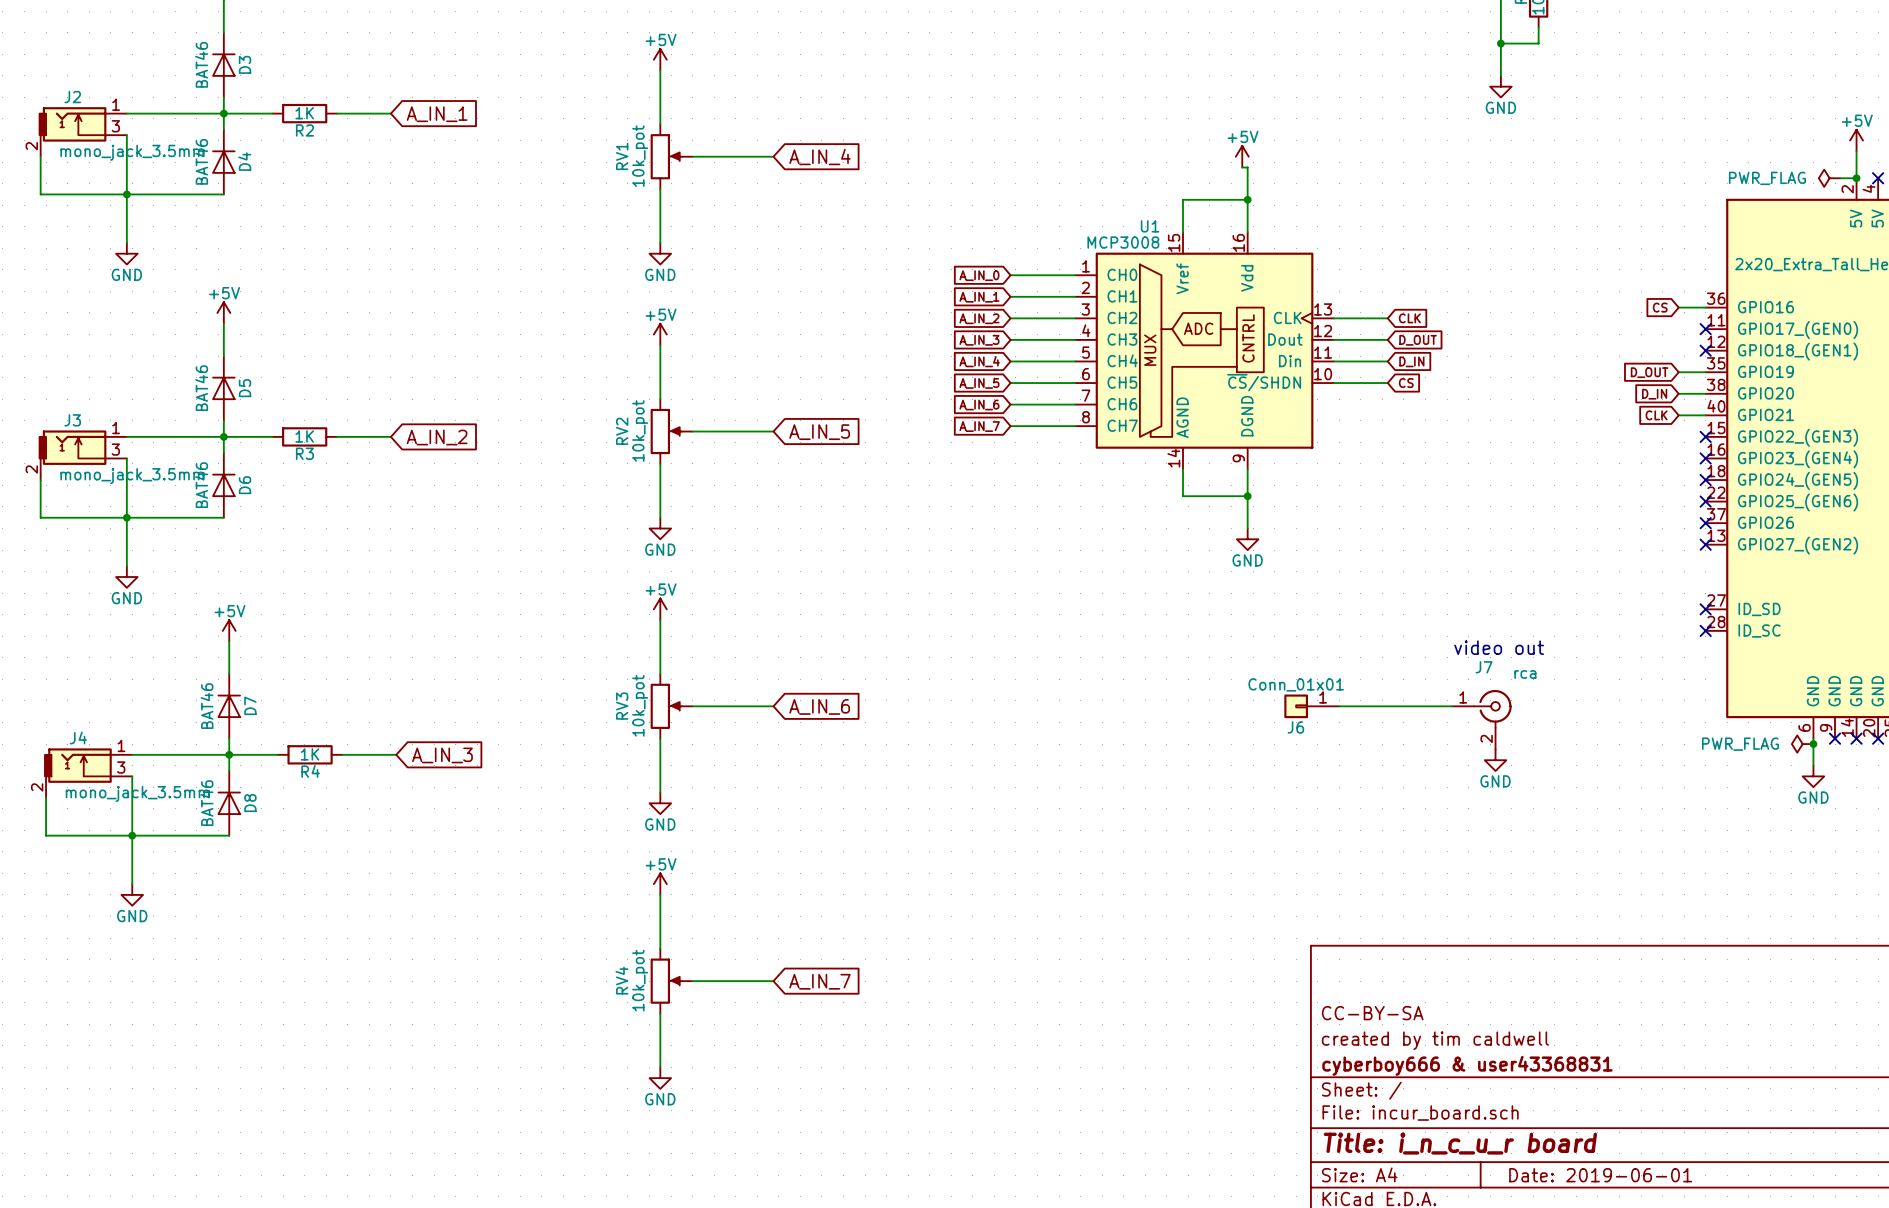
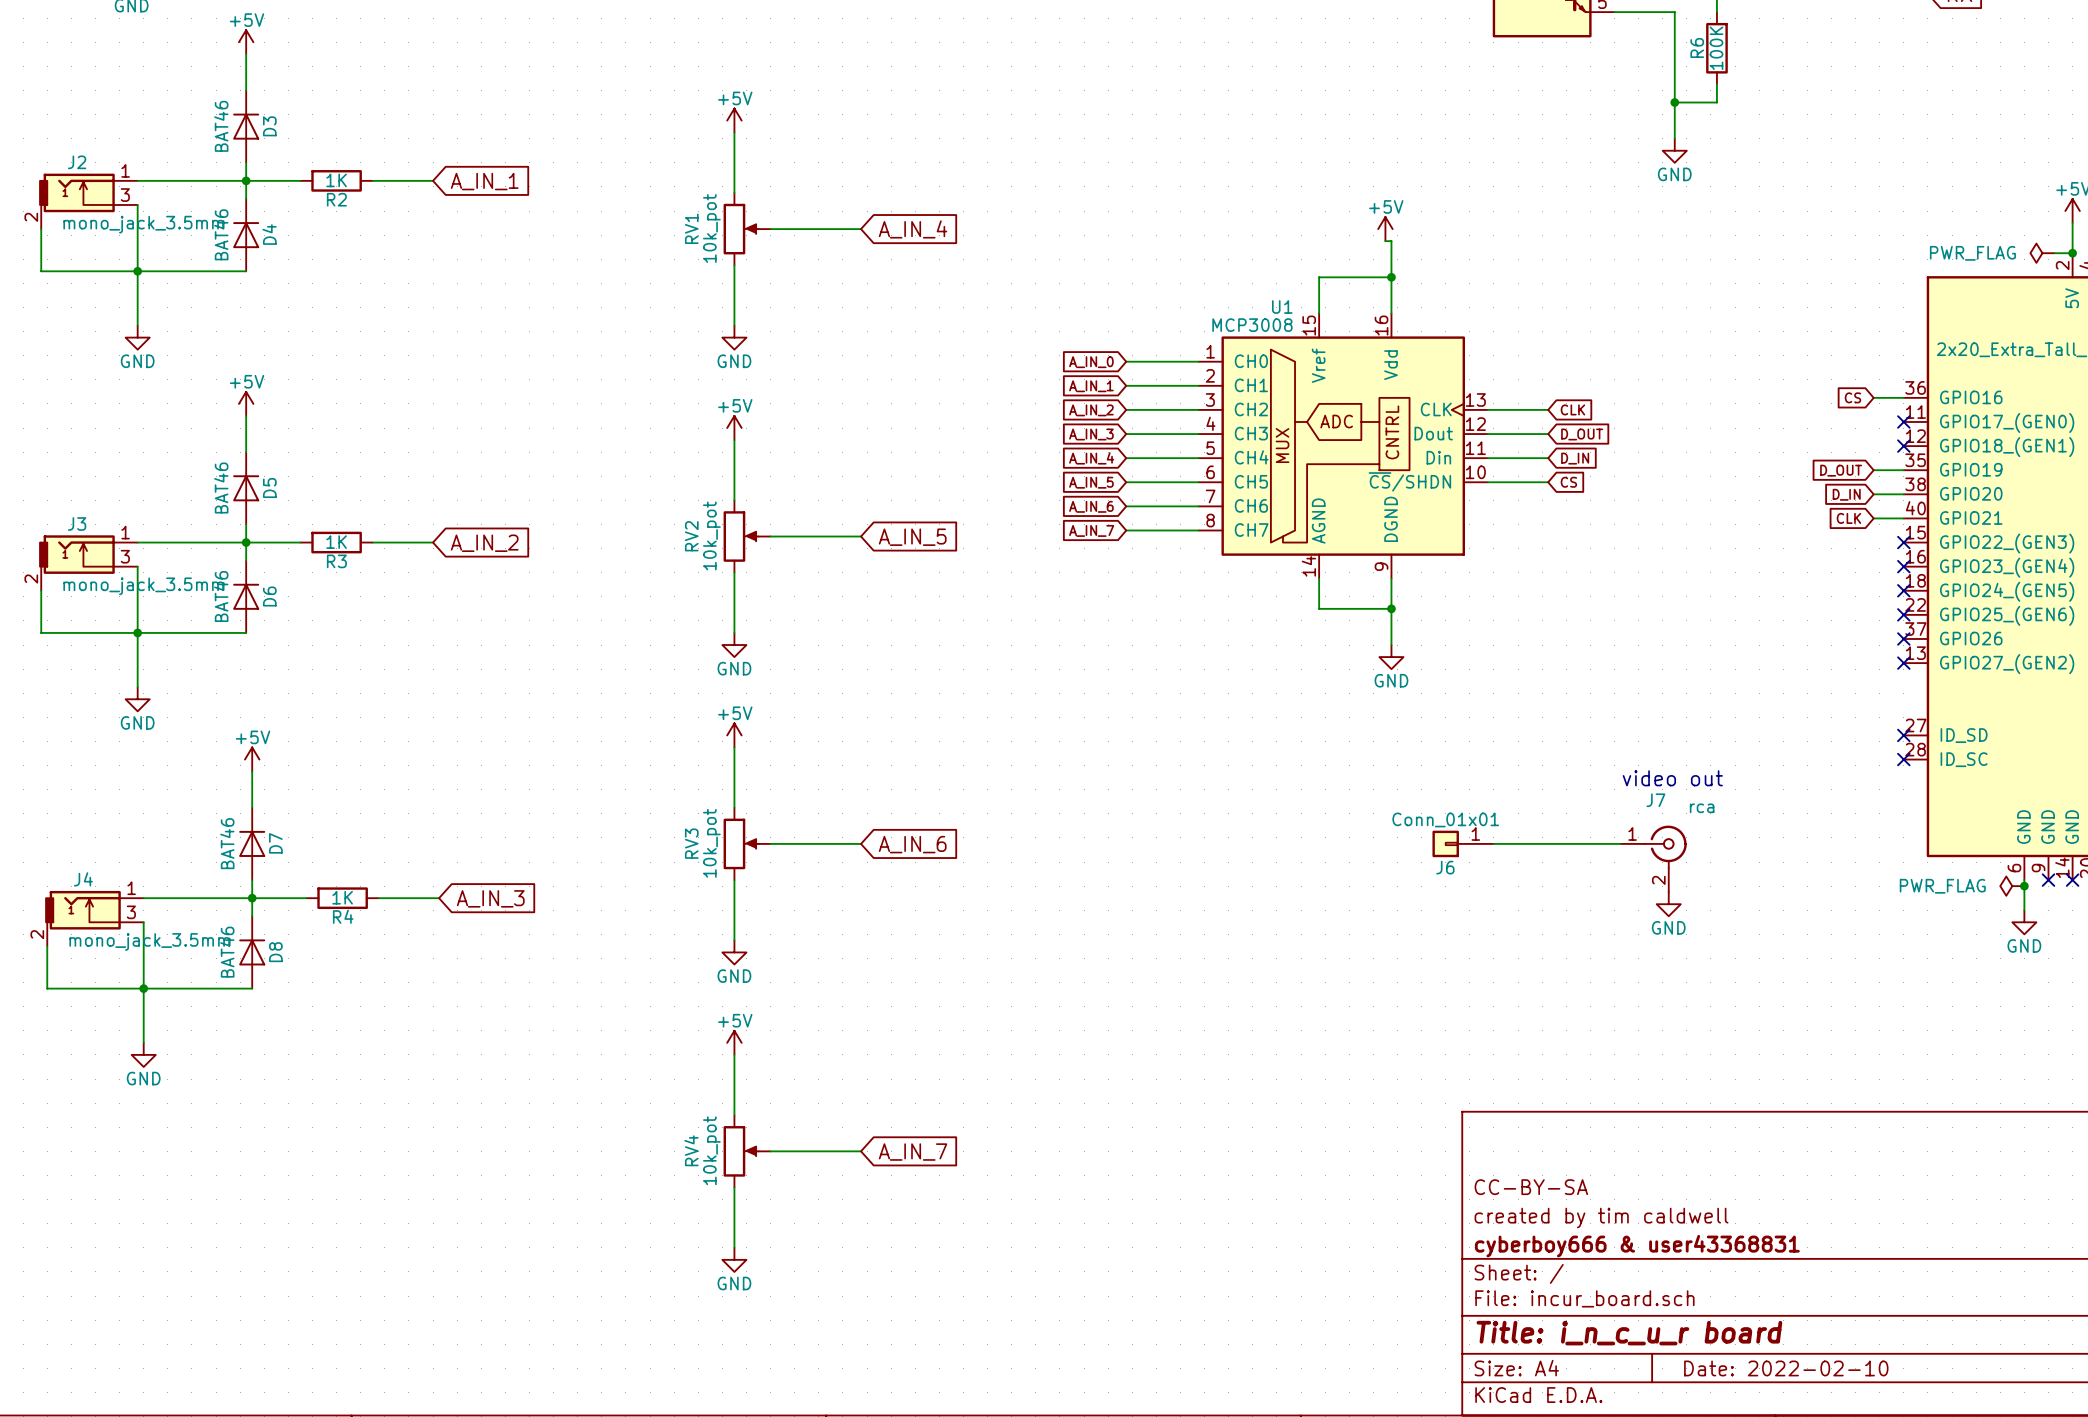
title block: Date: 2019-06-01 (1600, 1175) -> Date: 2022-02-10 (1786, 1368)

